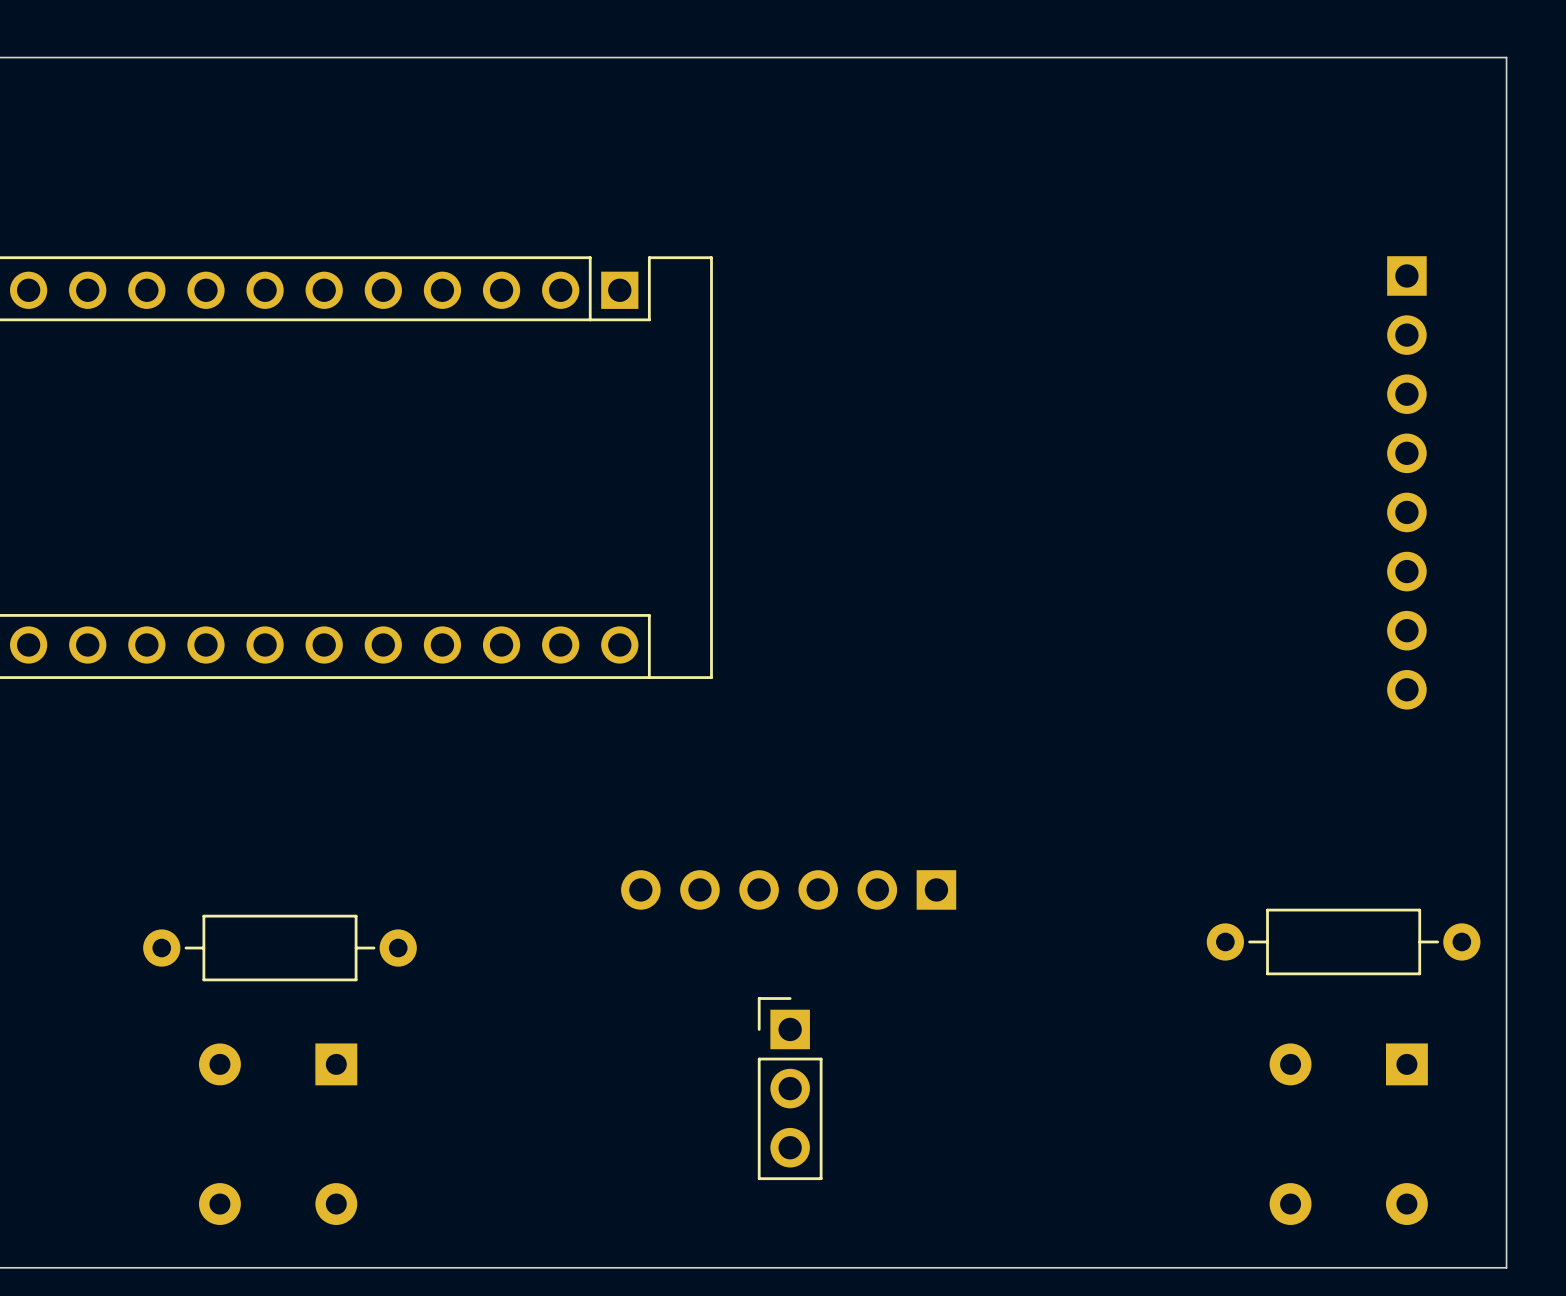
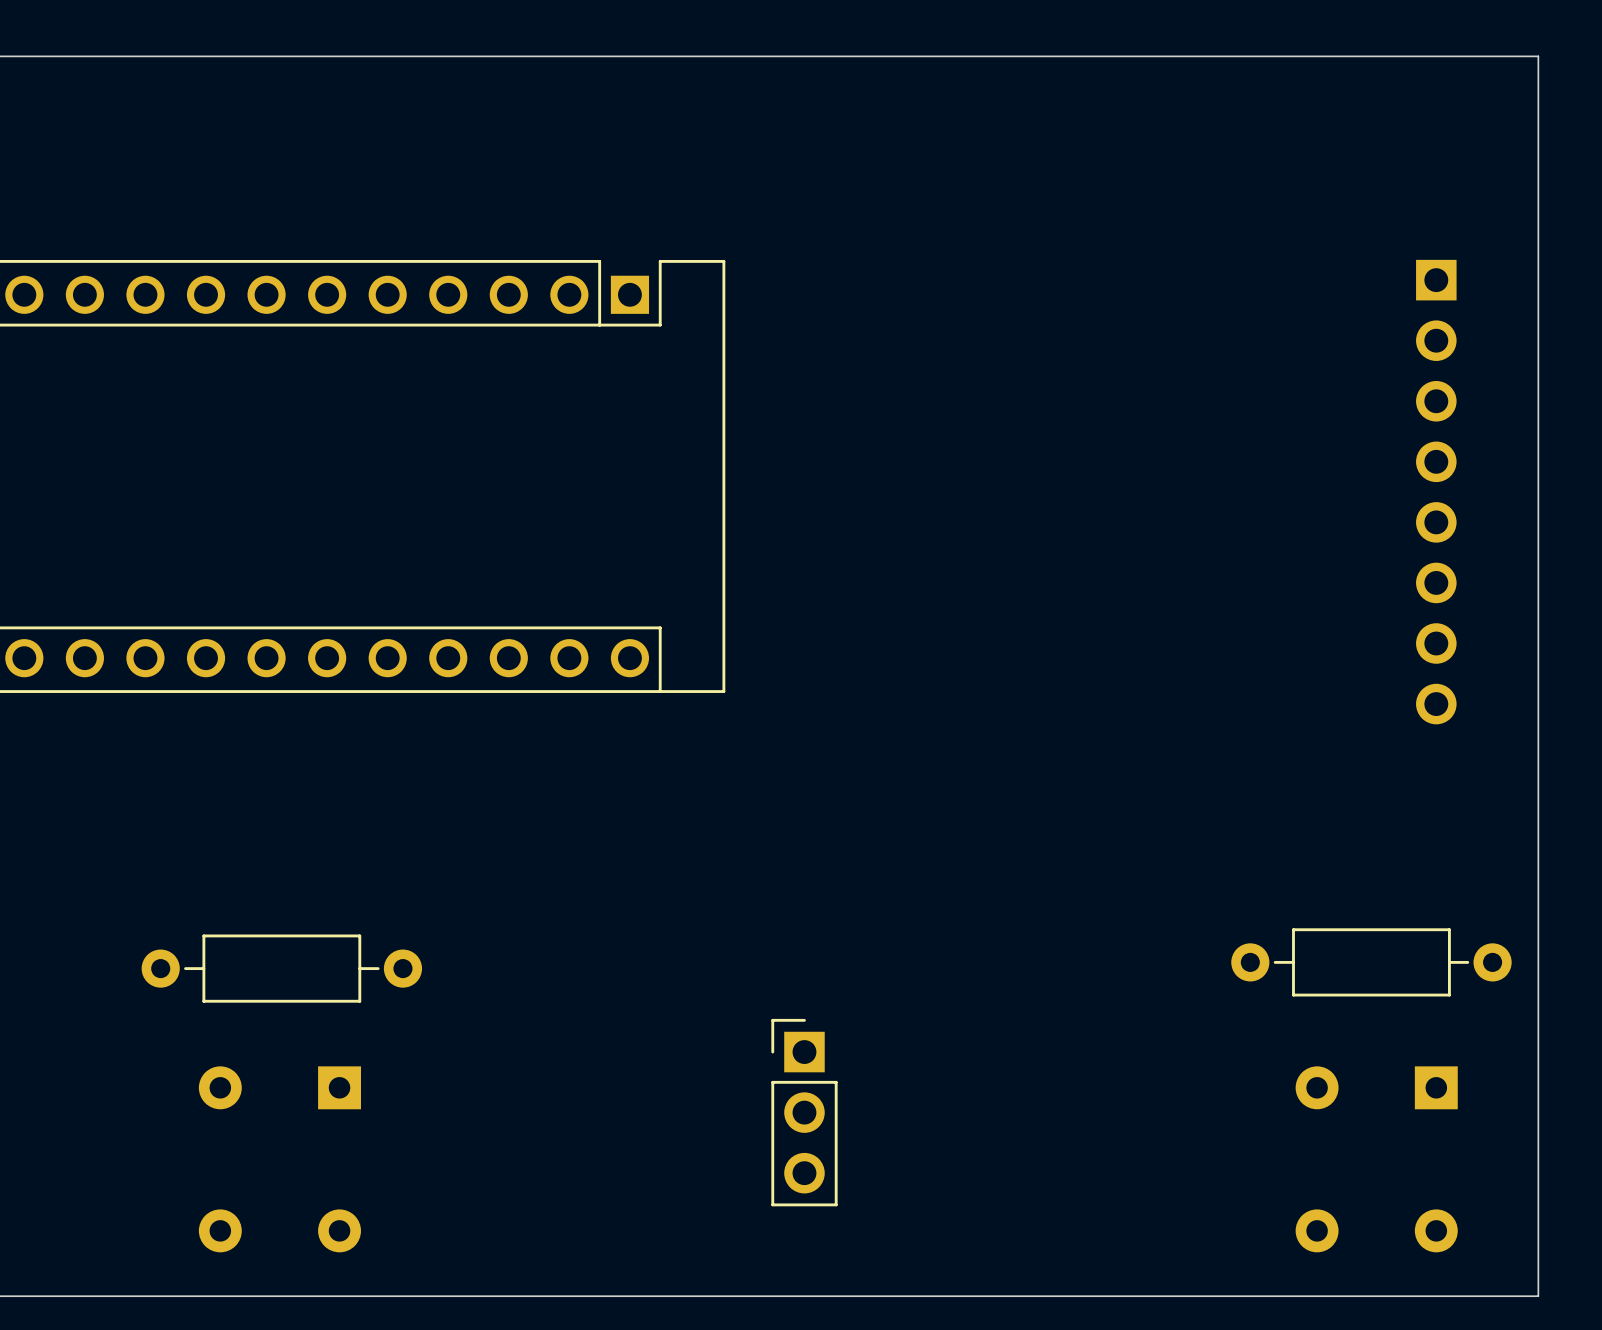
part: (788, 889) -> none

